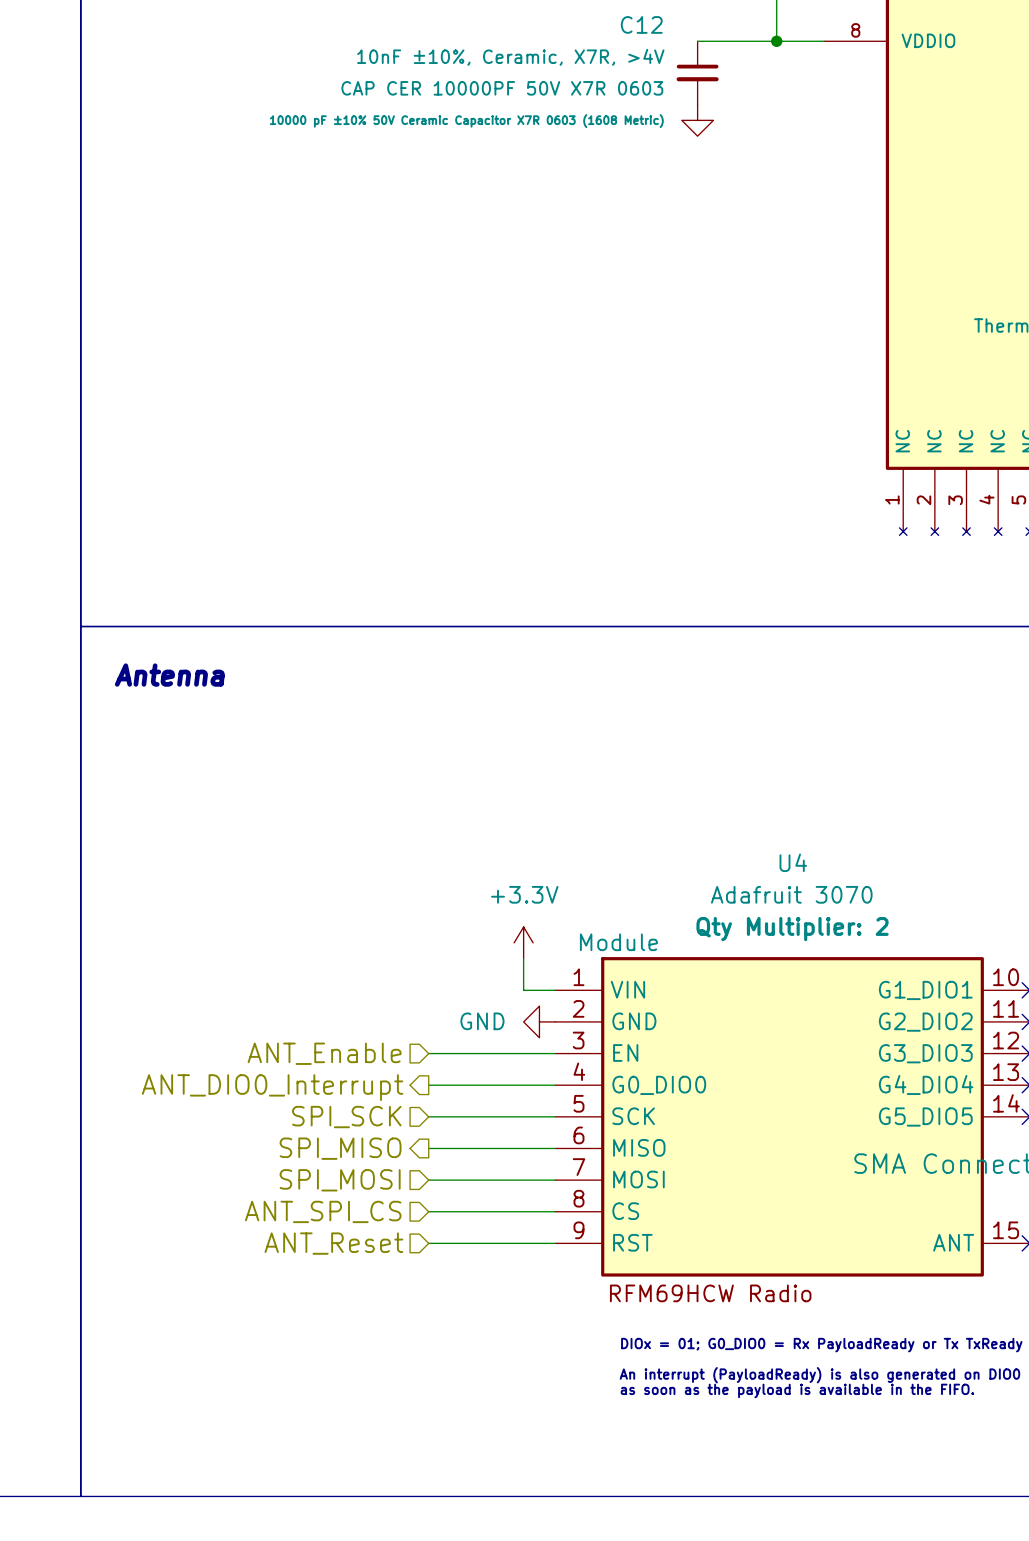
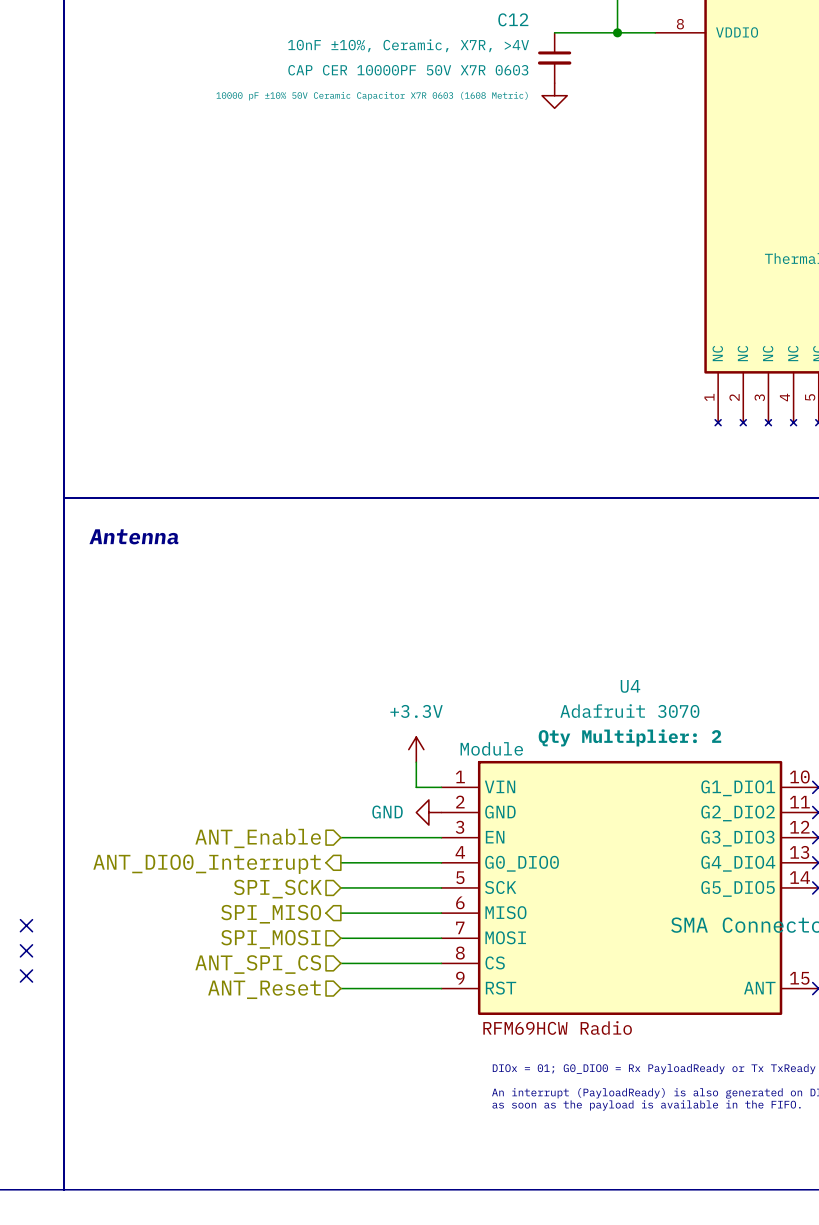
no-connect mark: none -> (26, 925)
no-connect mark: none -> (26, 950)
no-connect mark: none -> (26, 975)

